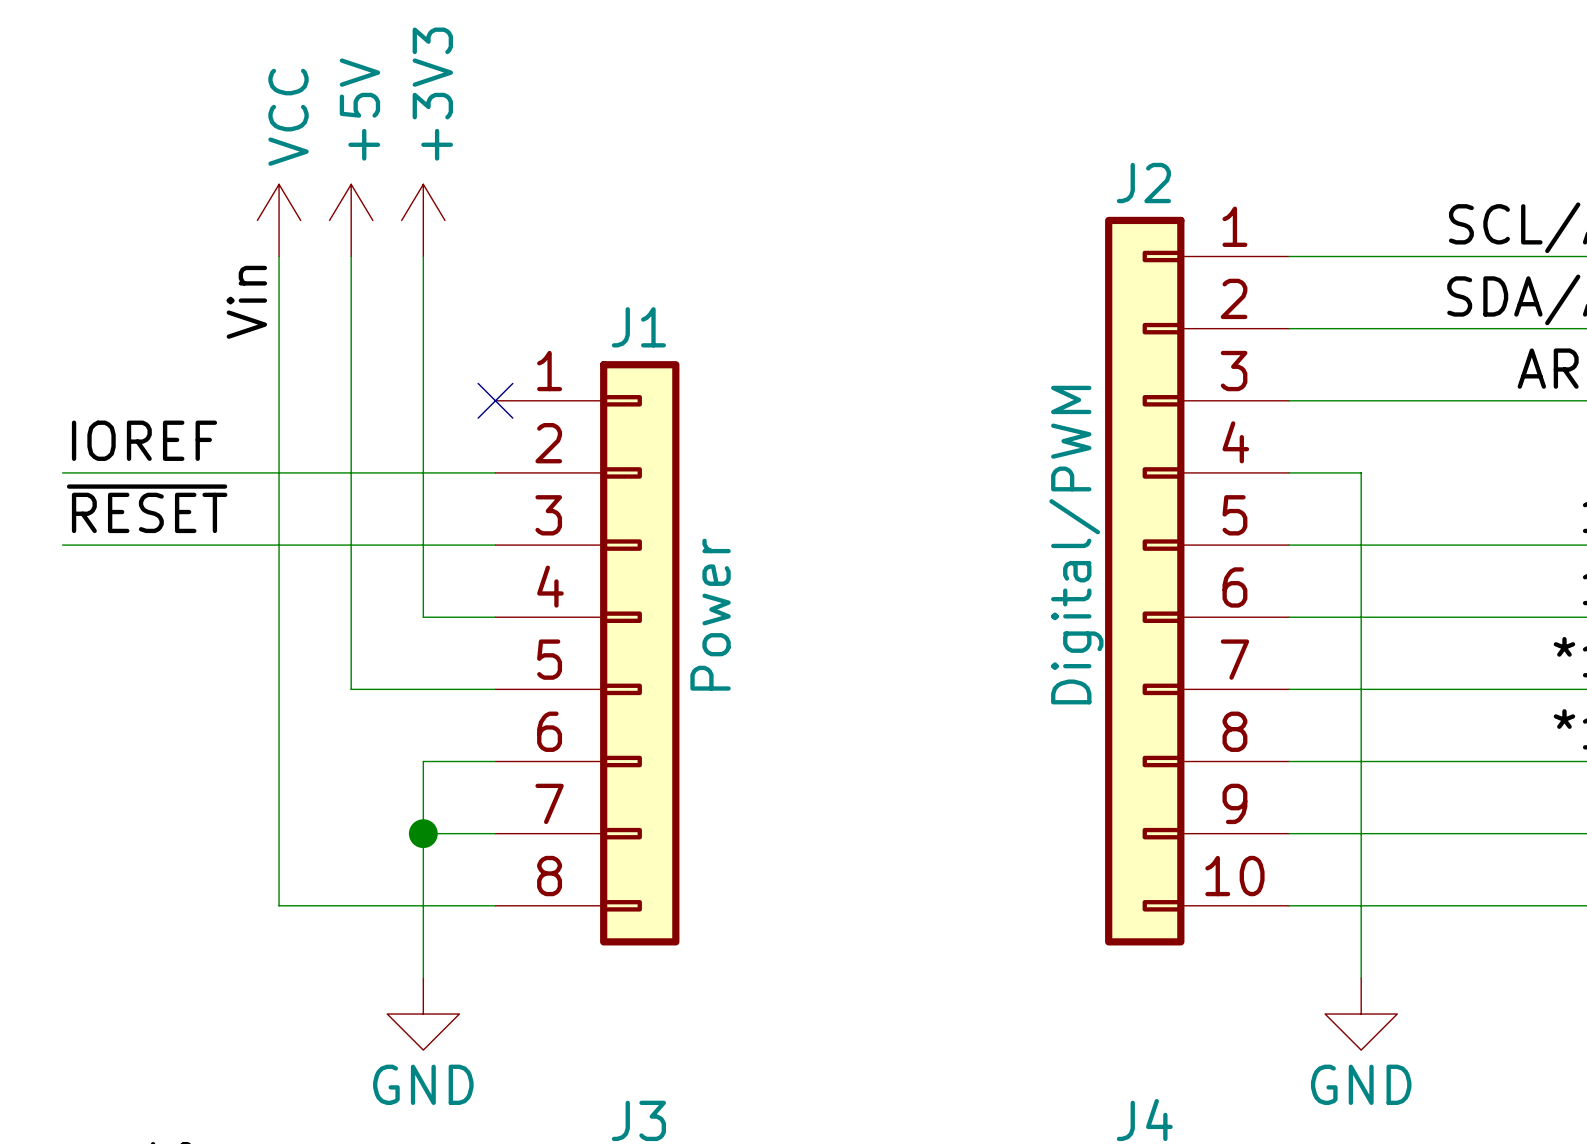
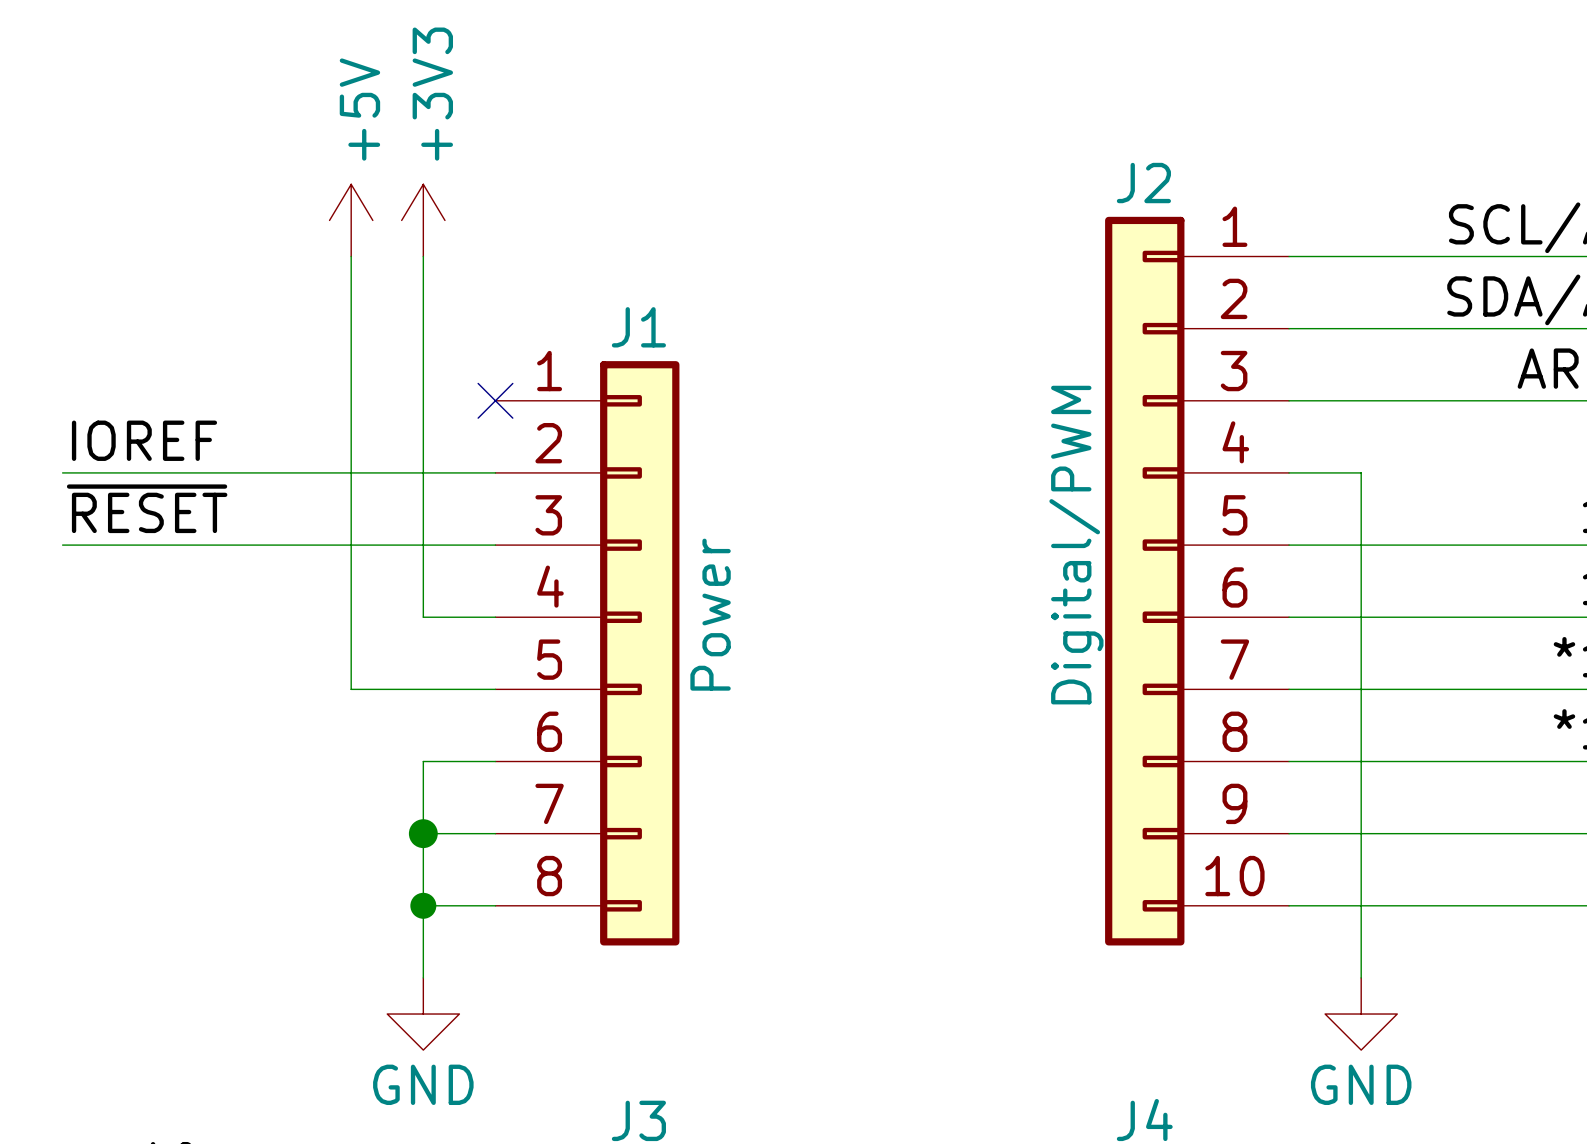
power symbol: VCC (279, 220) -> none
wire: (279, 256) (279, 905) (423, 905) -> none
label: Vin (246, 302) -> none
junction: none -> (423, 905)

